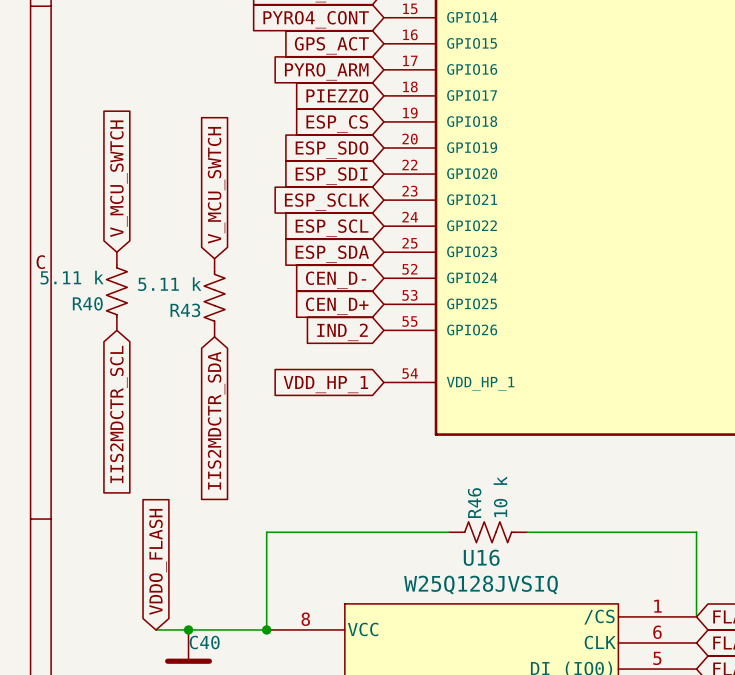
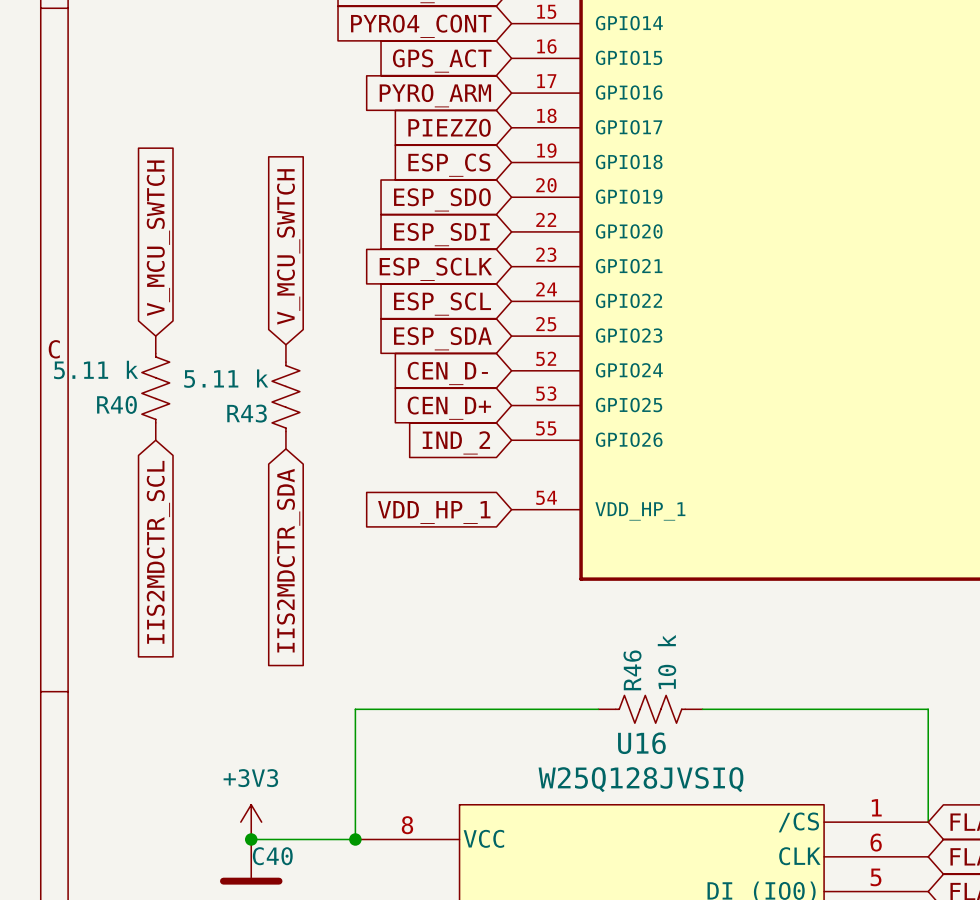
global label: VDDO_FLASH (157, 561) -> none
power symbol: none -> +3V3 (251, 822)
wire: (155, 629) (188, 629) -> none

